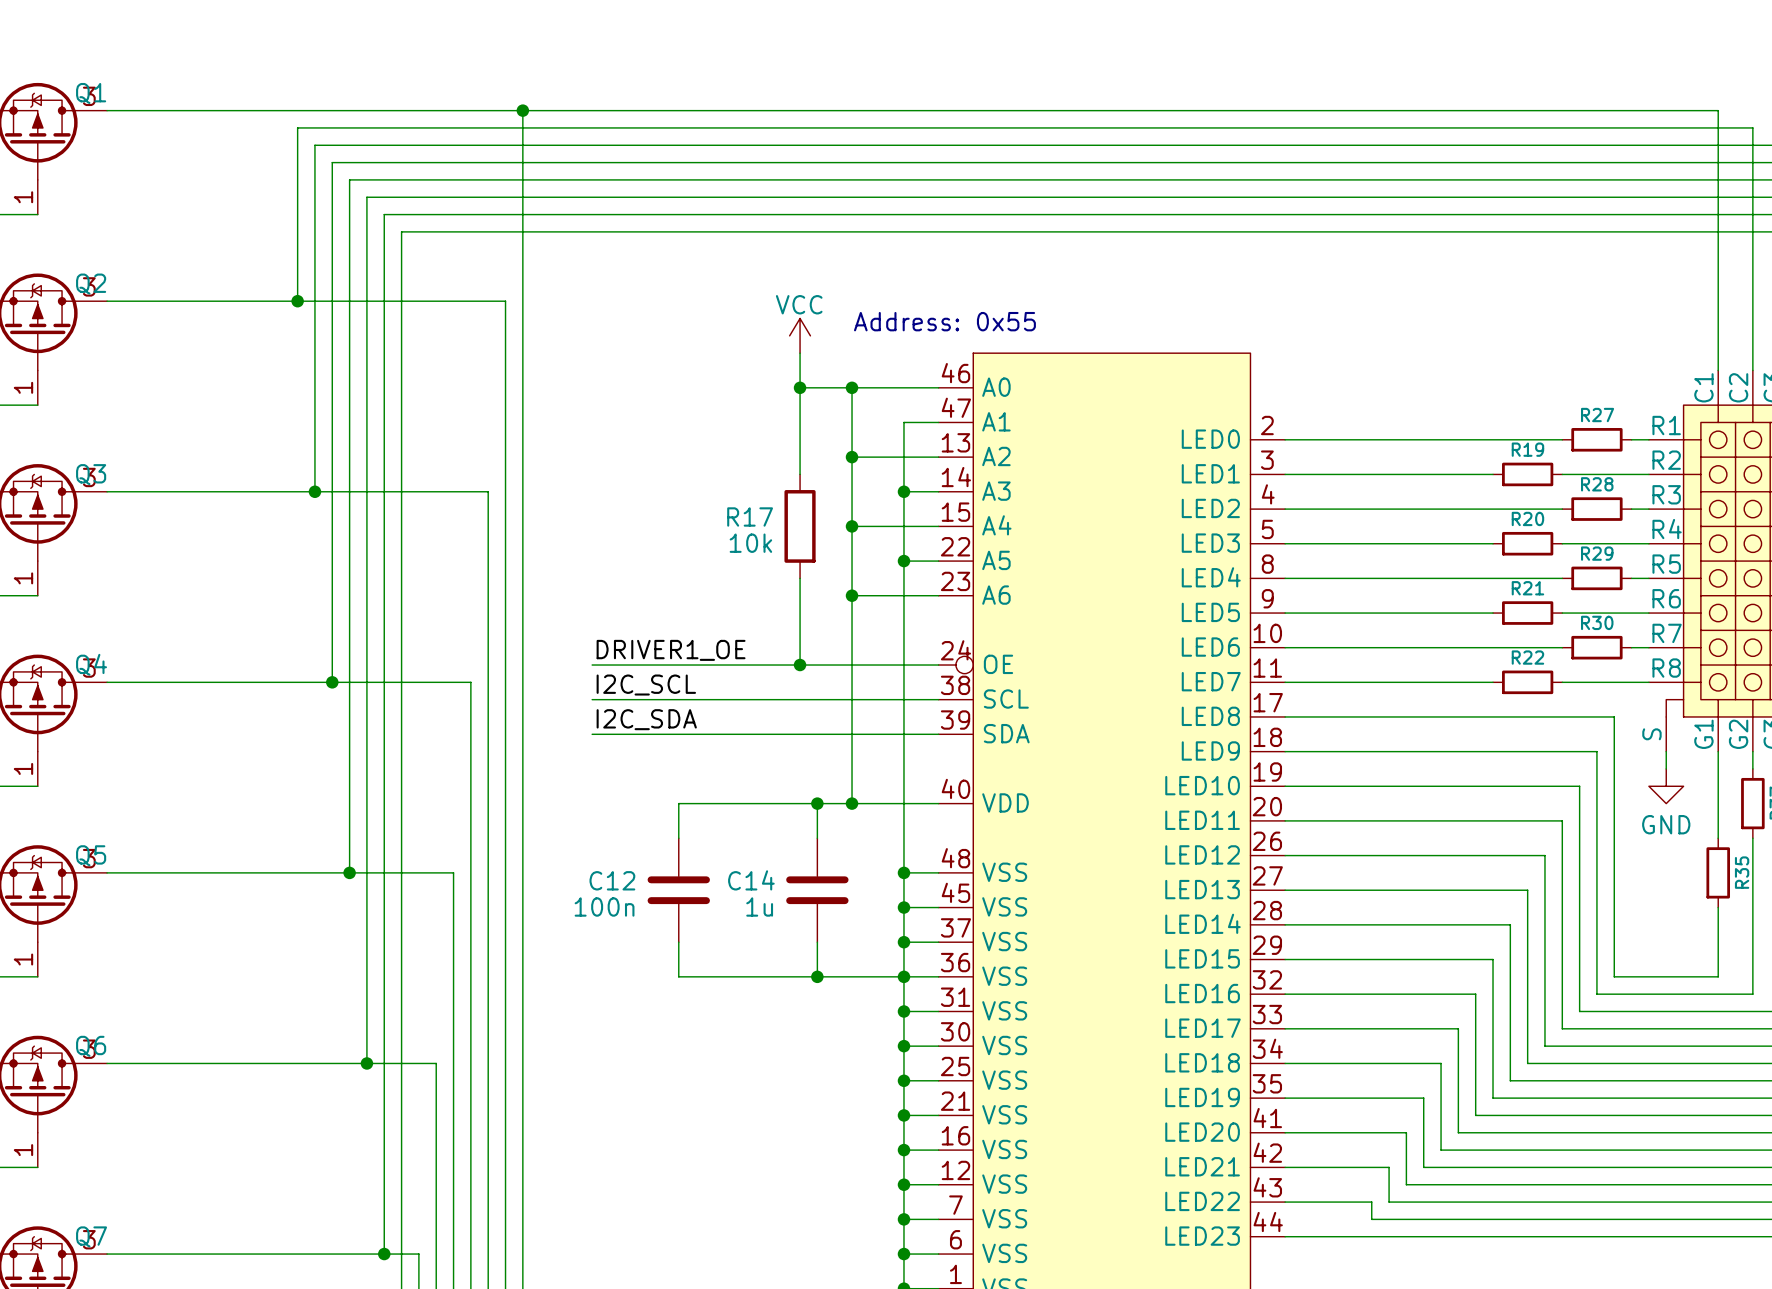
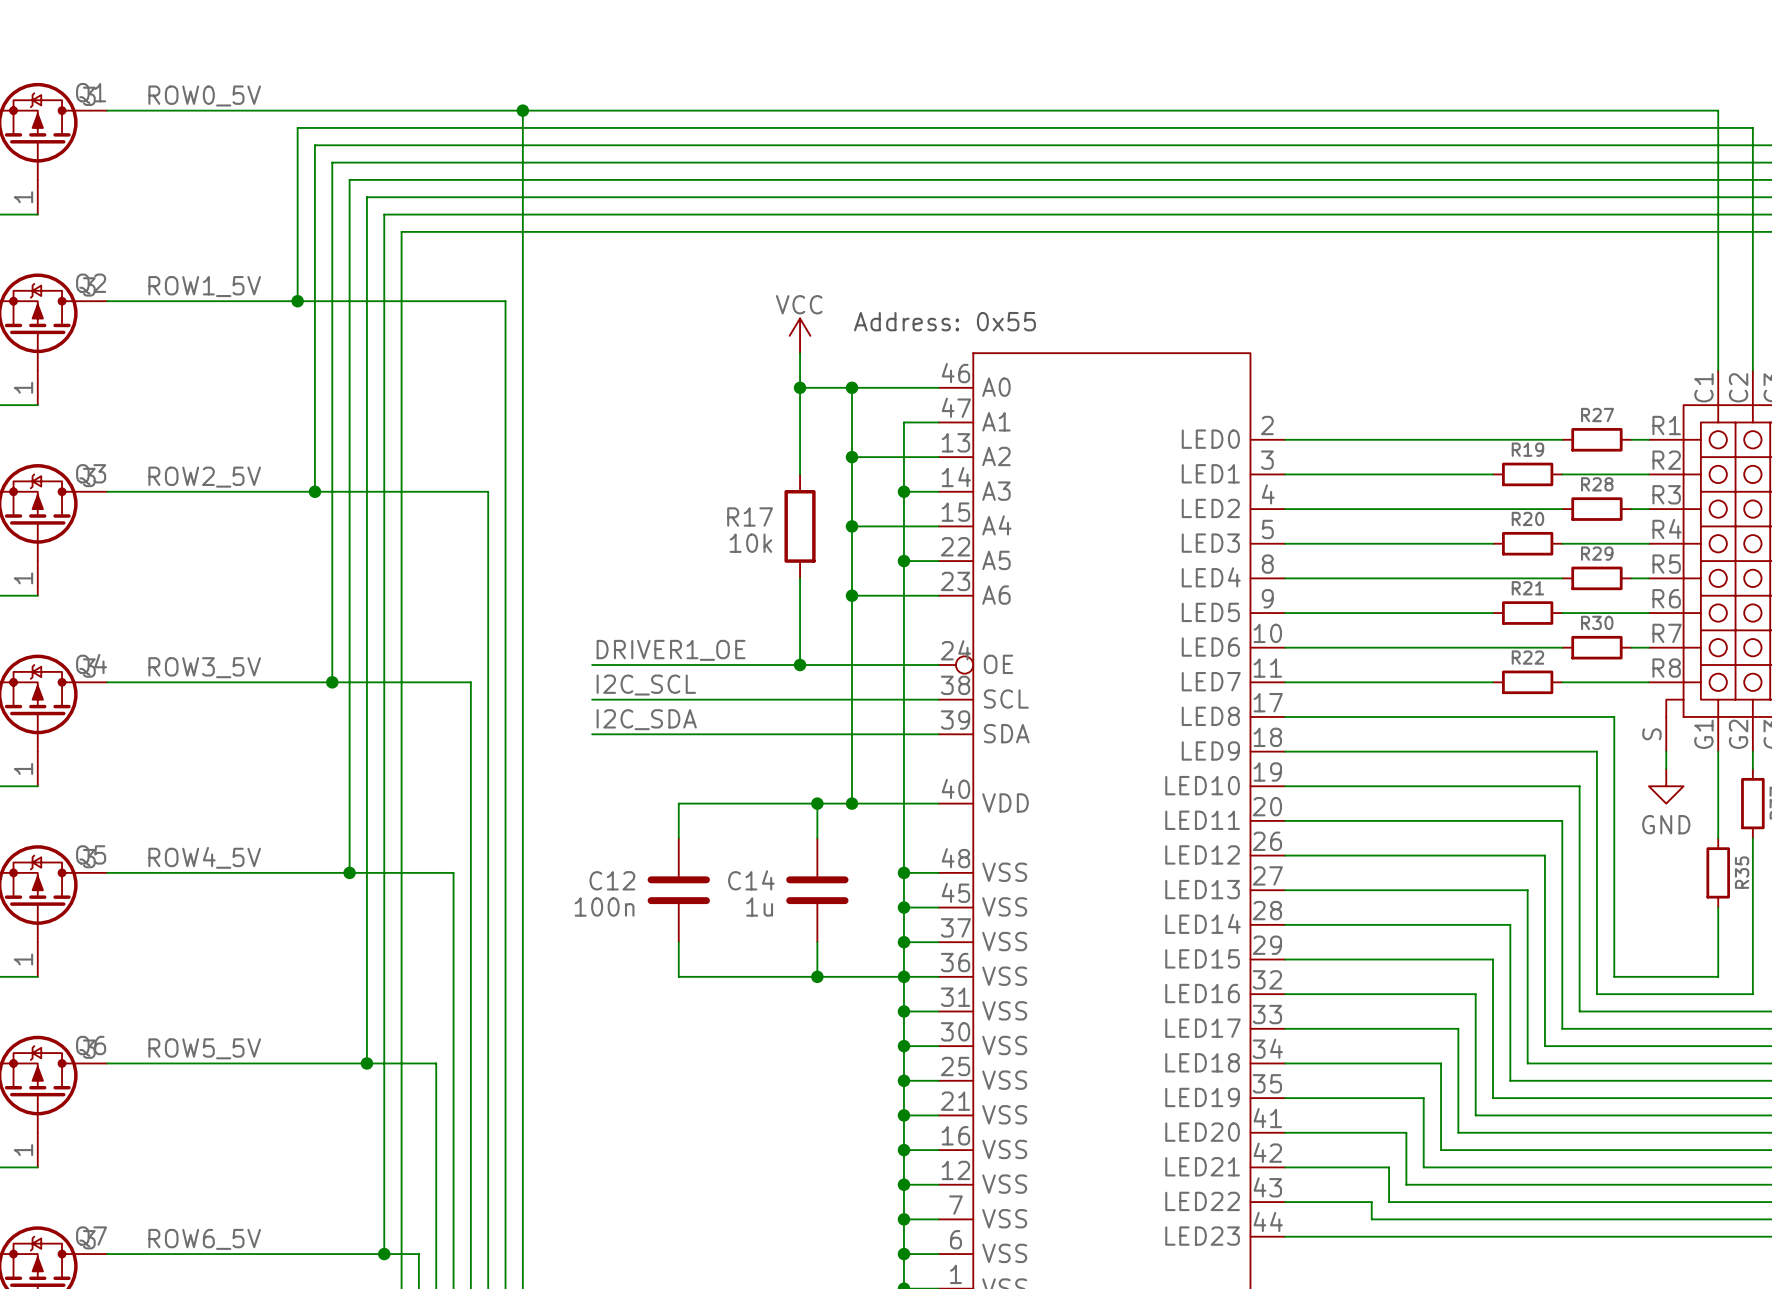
label: none -> ROW0_5V (204, 96)
label: none -> ROW1_5V (204, 286)
label: none -> ROW2_5V (204, 477)
label: none -> ROW3_5V (204, 667)
label: none -> ROW4_5V (204, 857)
label: none -> ROW5_5V (204, 1048)
label: none -> ROW6_5V (204, 1239)

